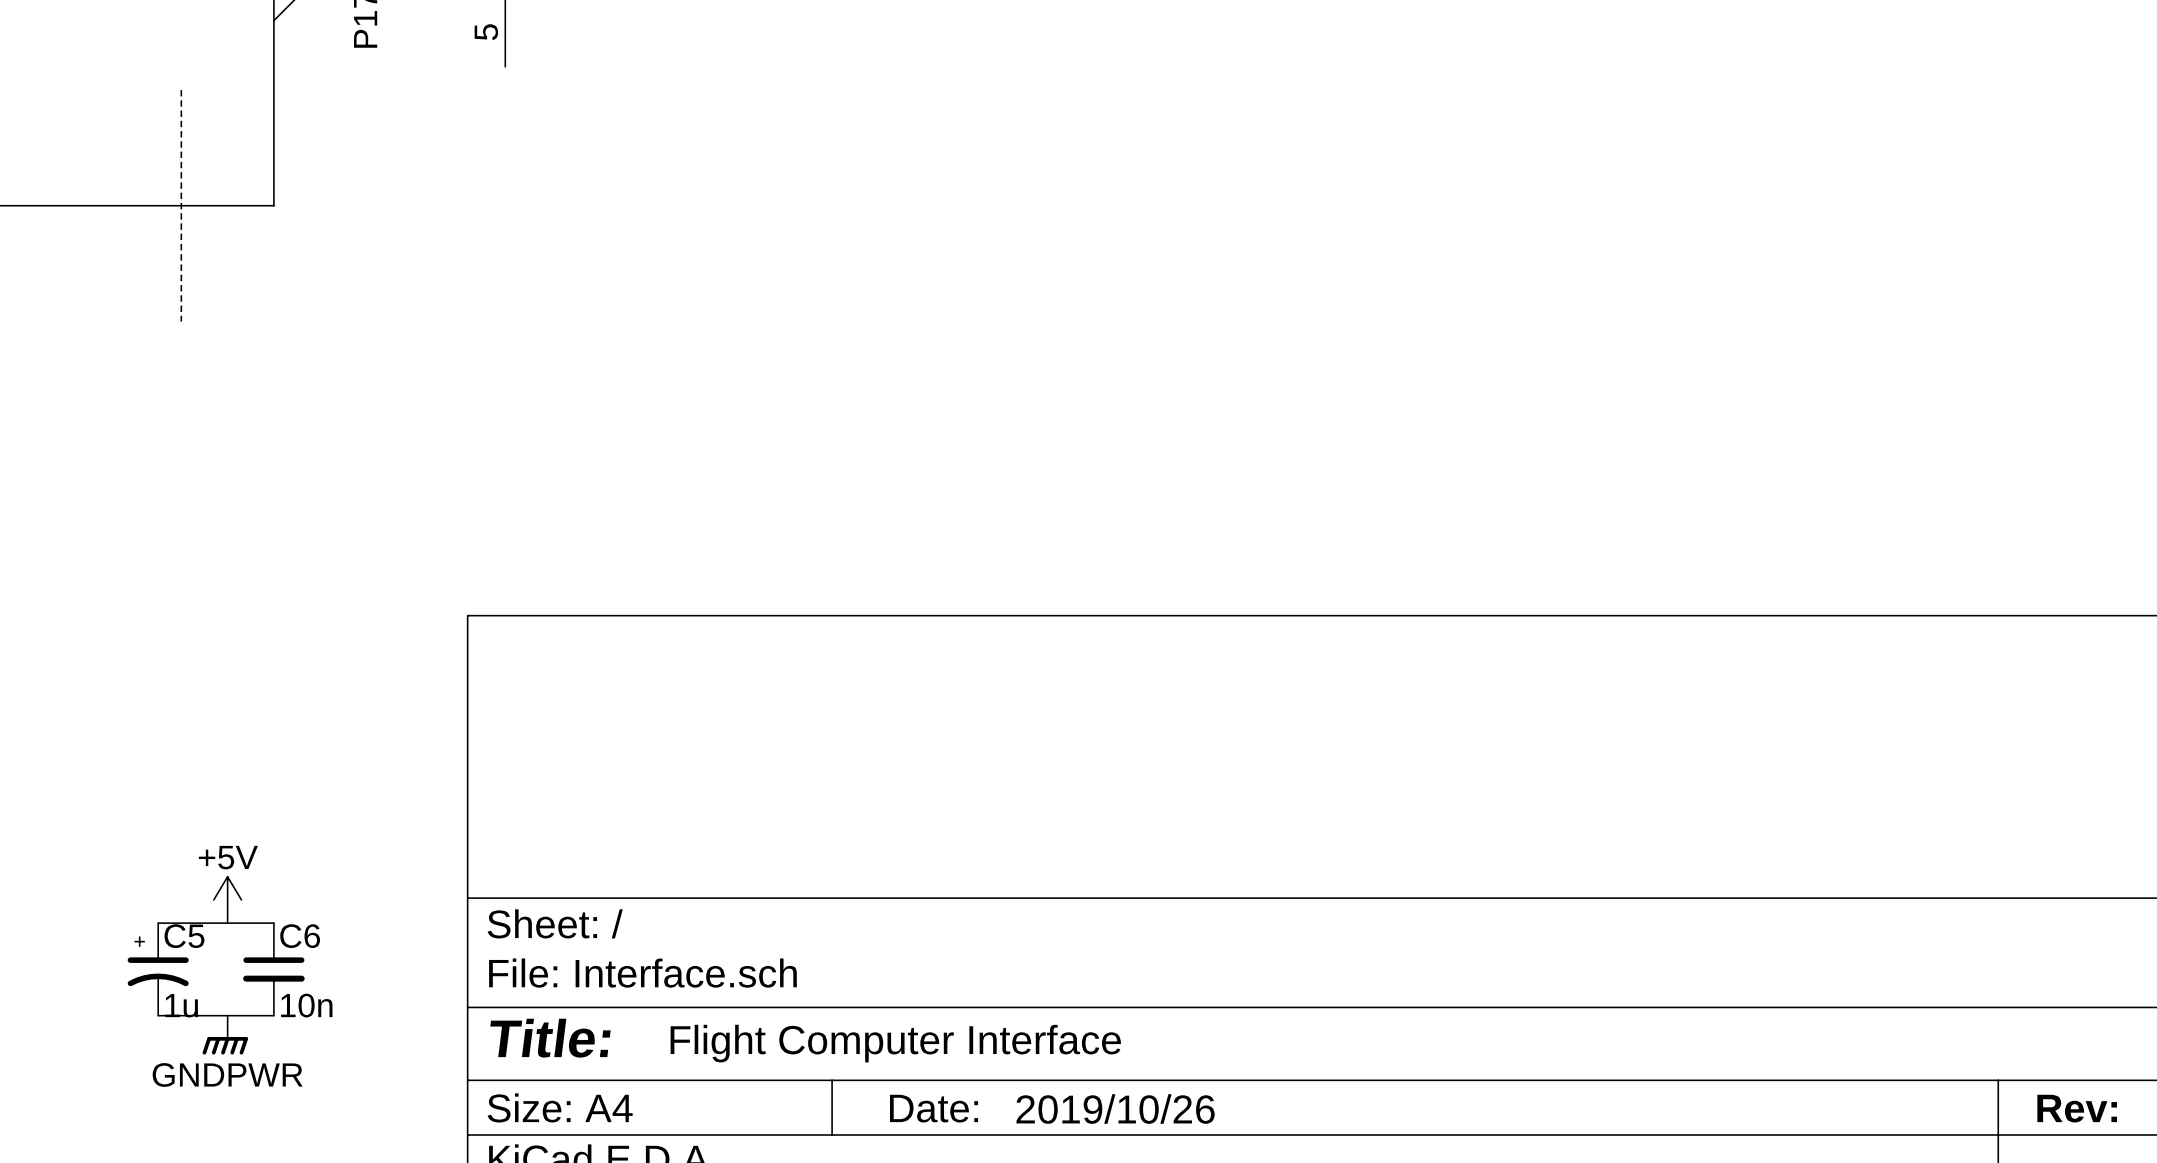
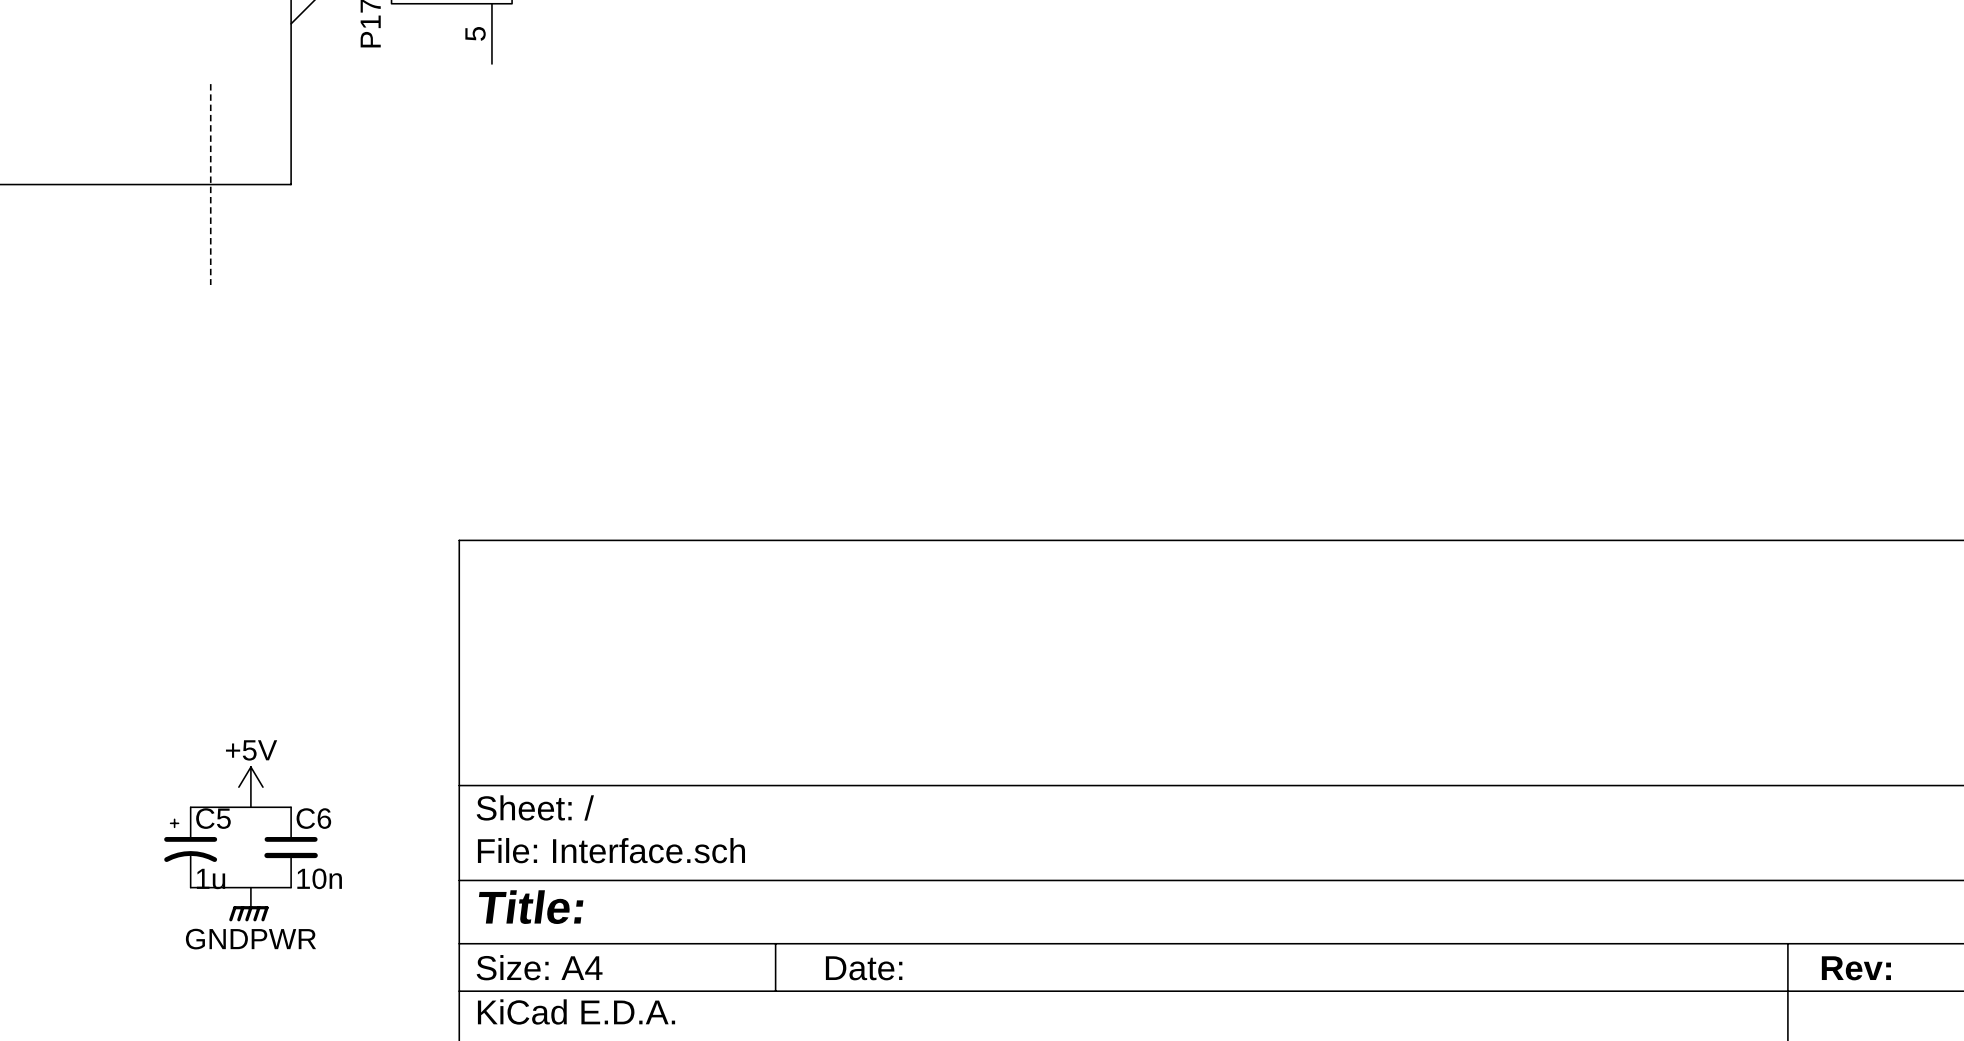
text: Flight Computer Interface (895, 1043) -> none
text: 2019/10/26 (1115, 1109) -> none

